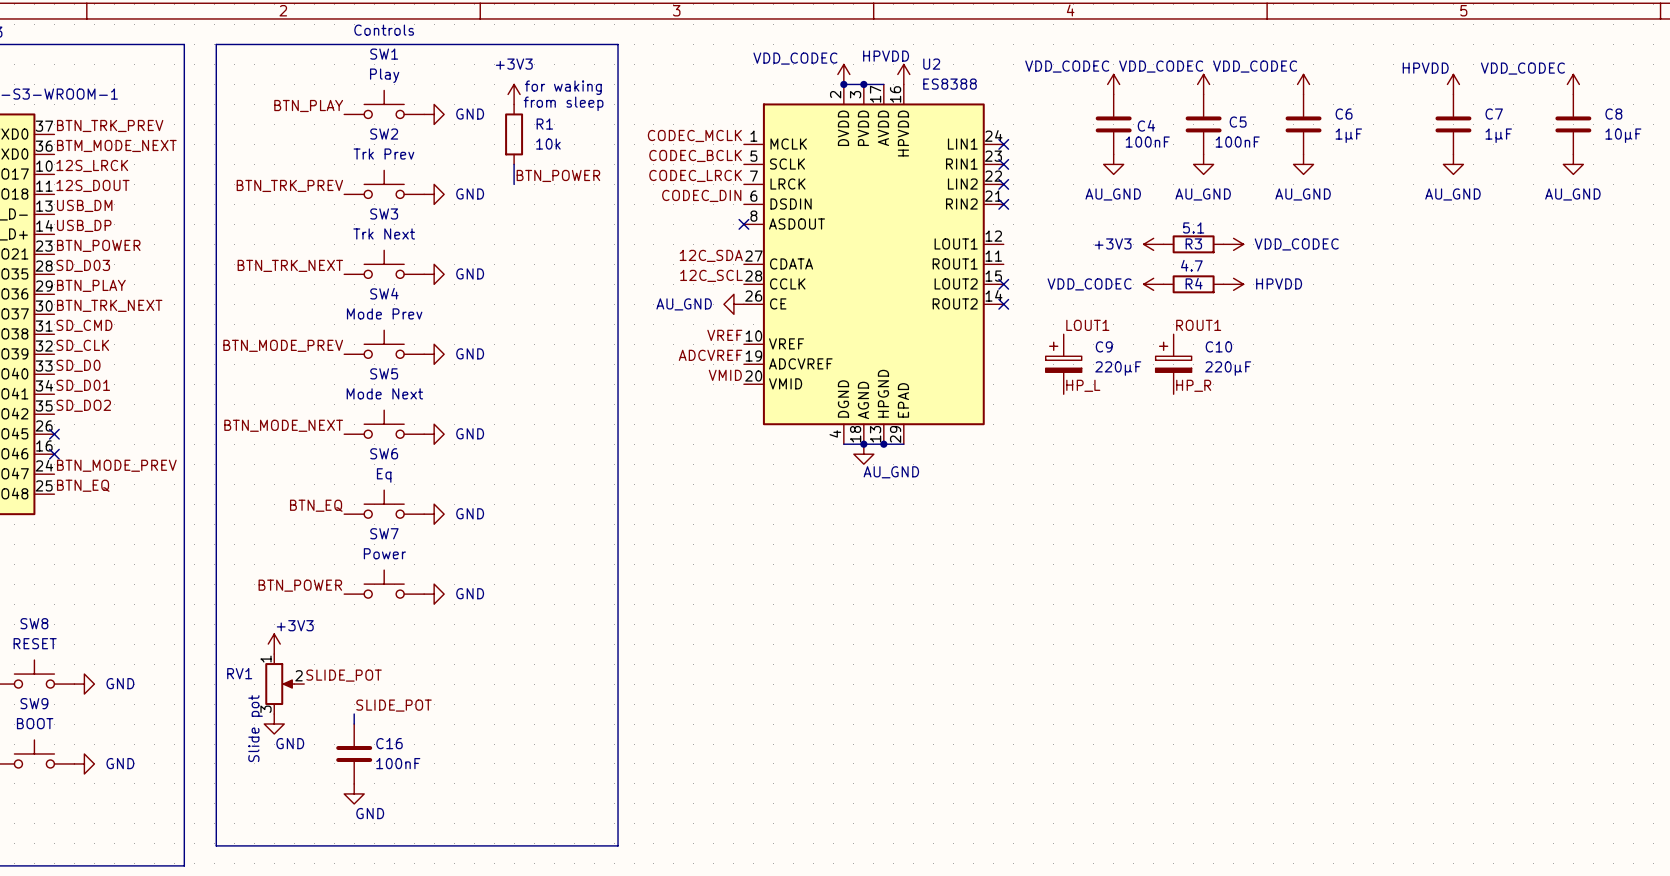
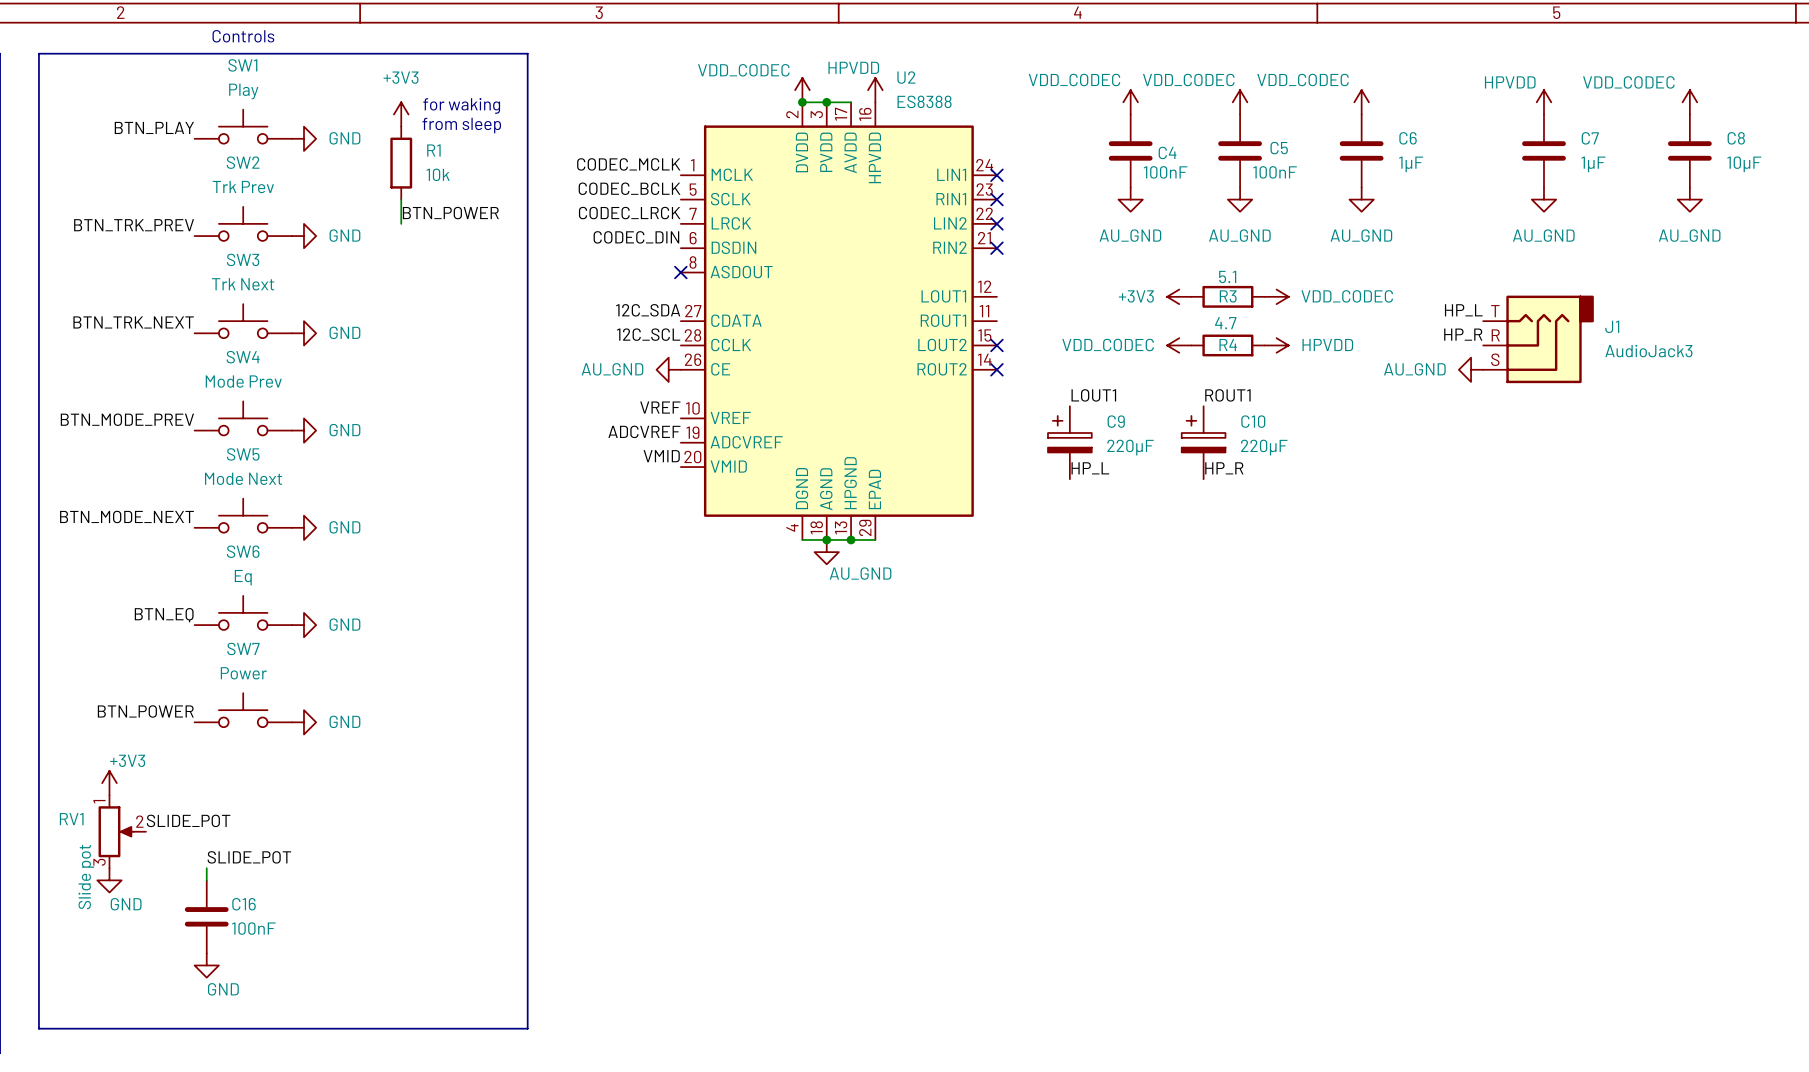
label: none -> HP_L (1463, 310)
label: none -> HP_R (1463, 334)
J1: none -> AudioJack3 (1538, 339)
power symbol: none -> AU_GND (1471, 369)

